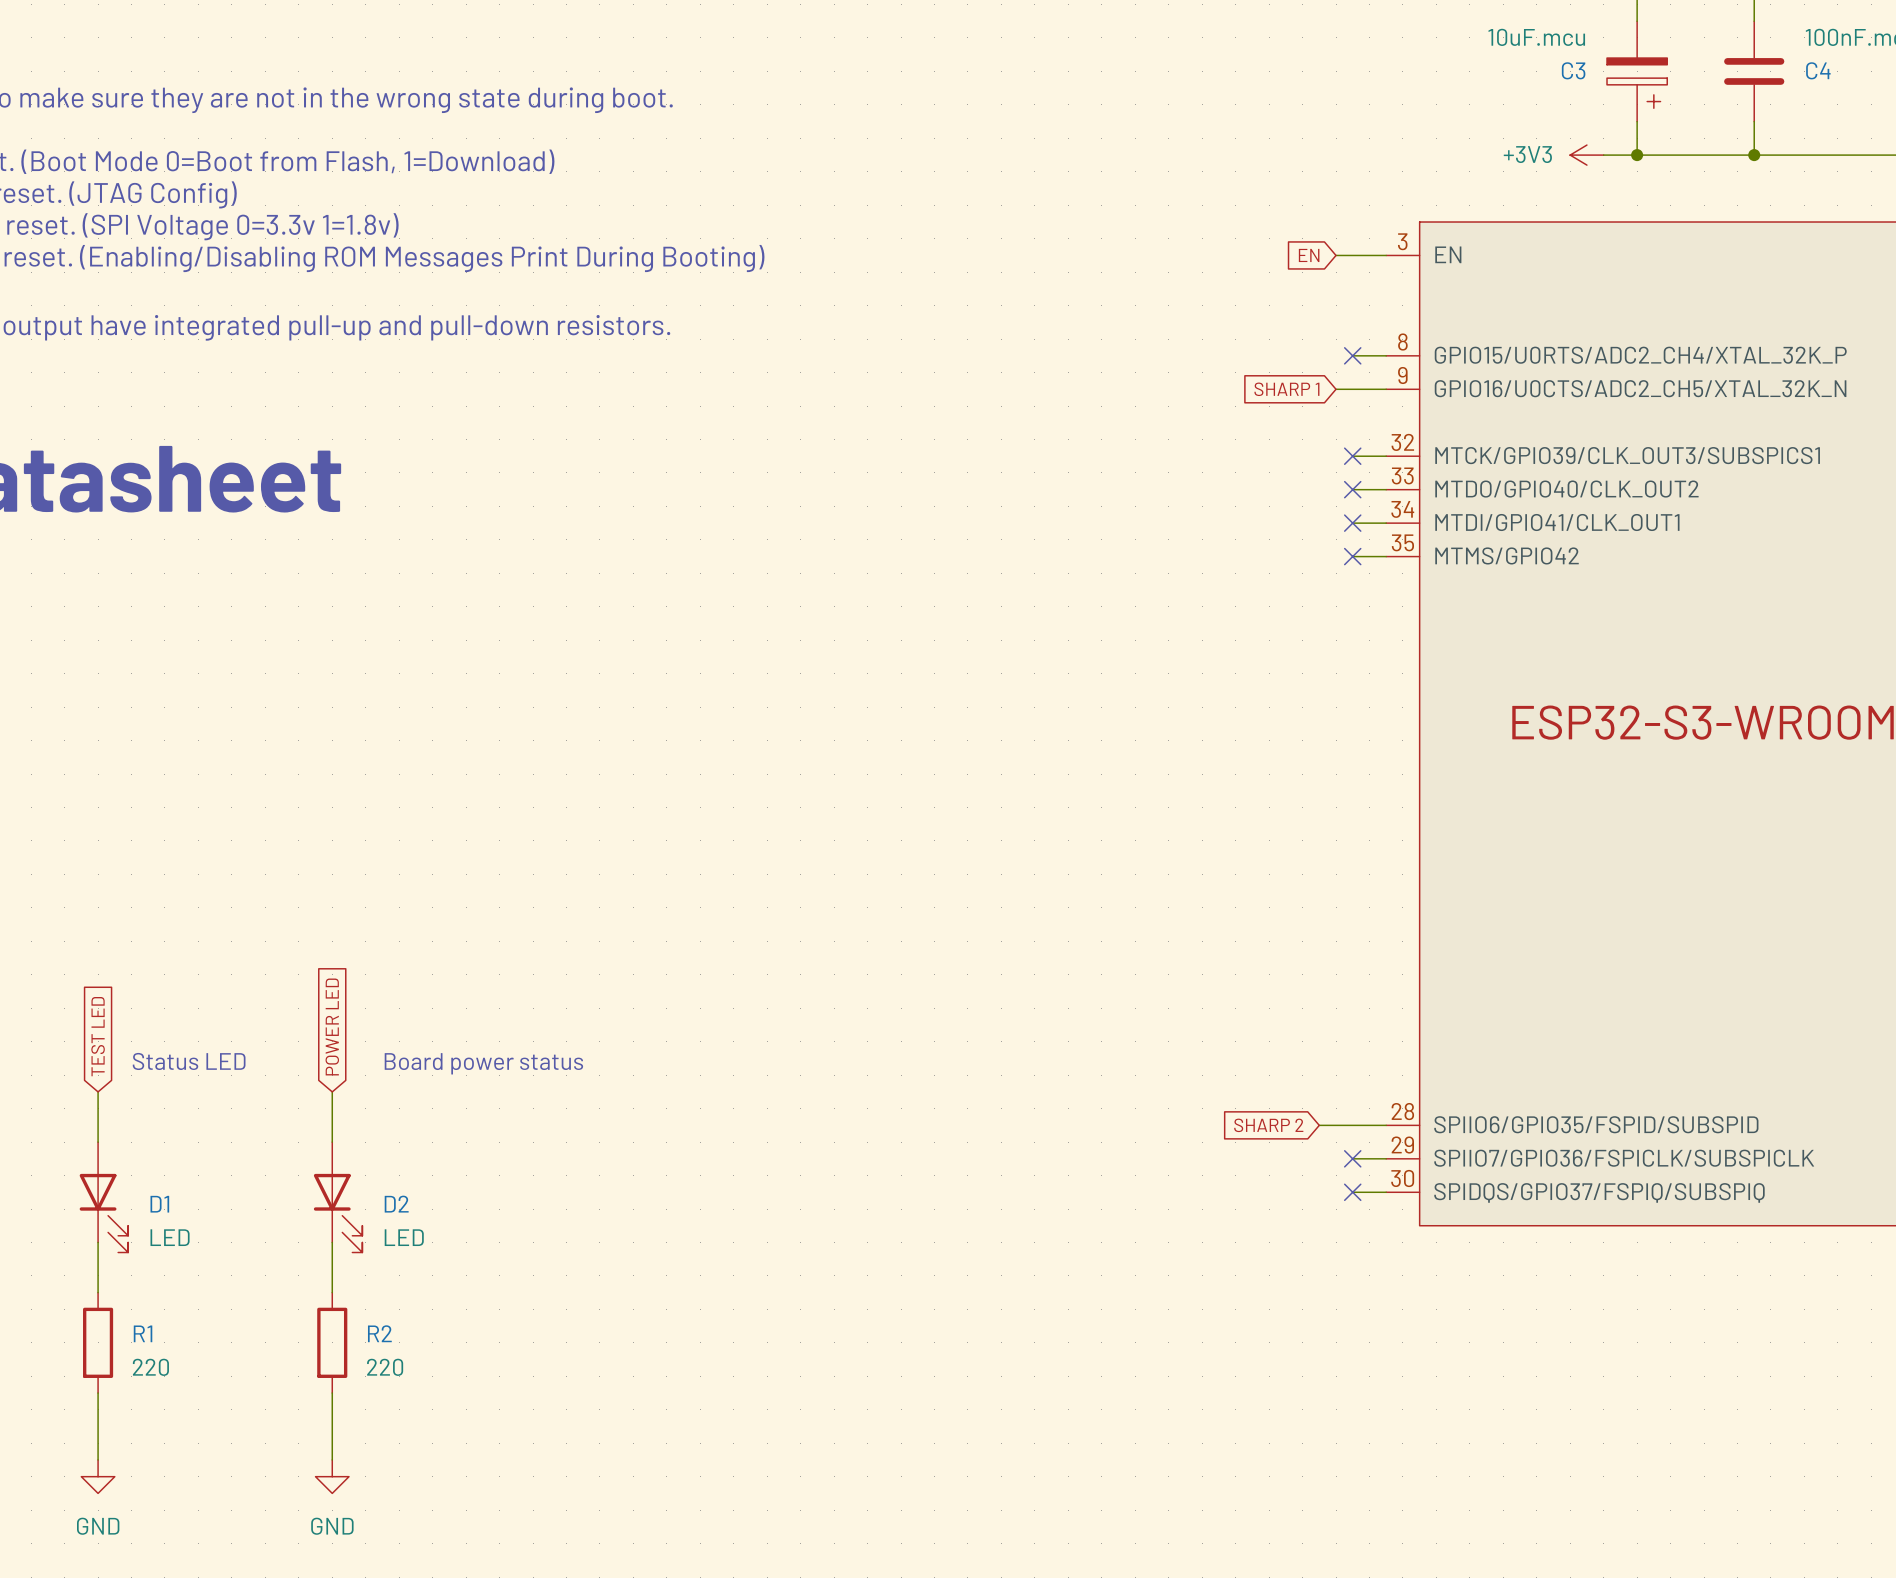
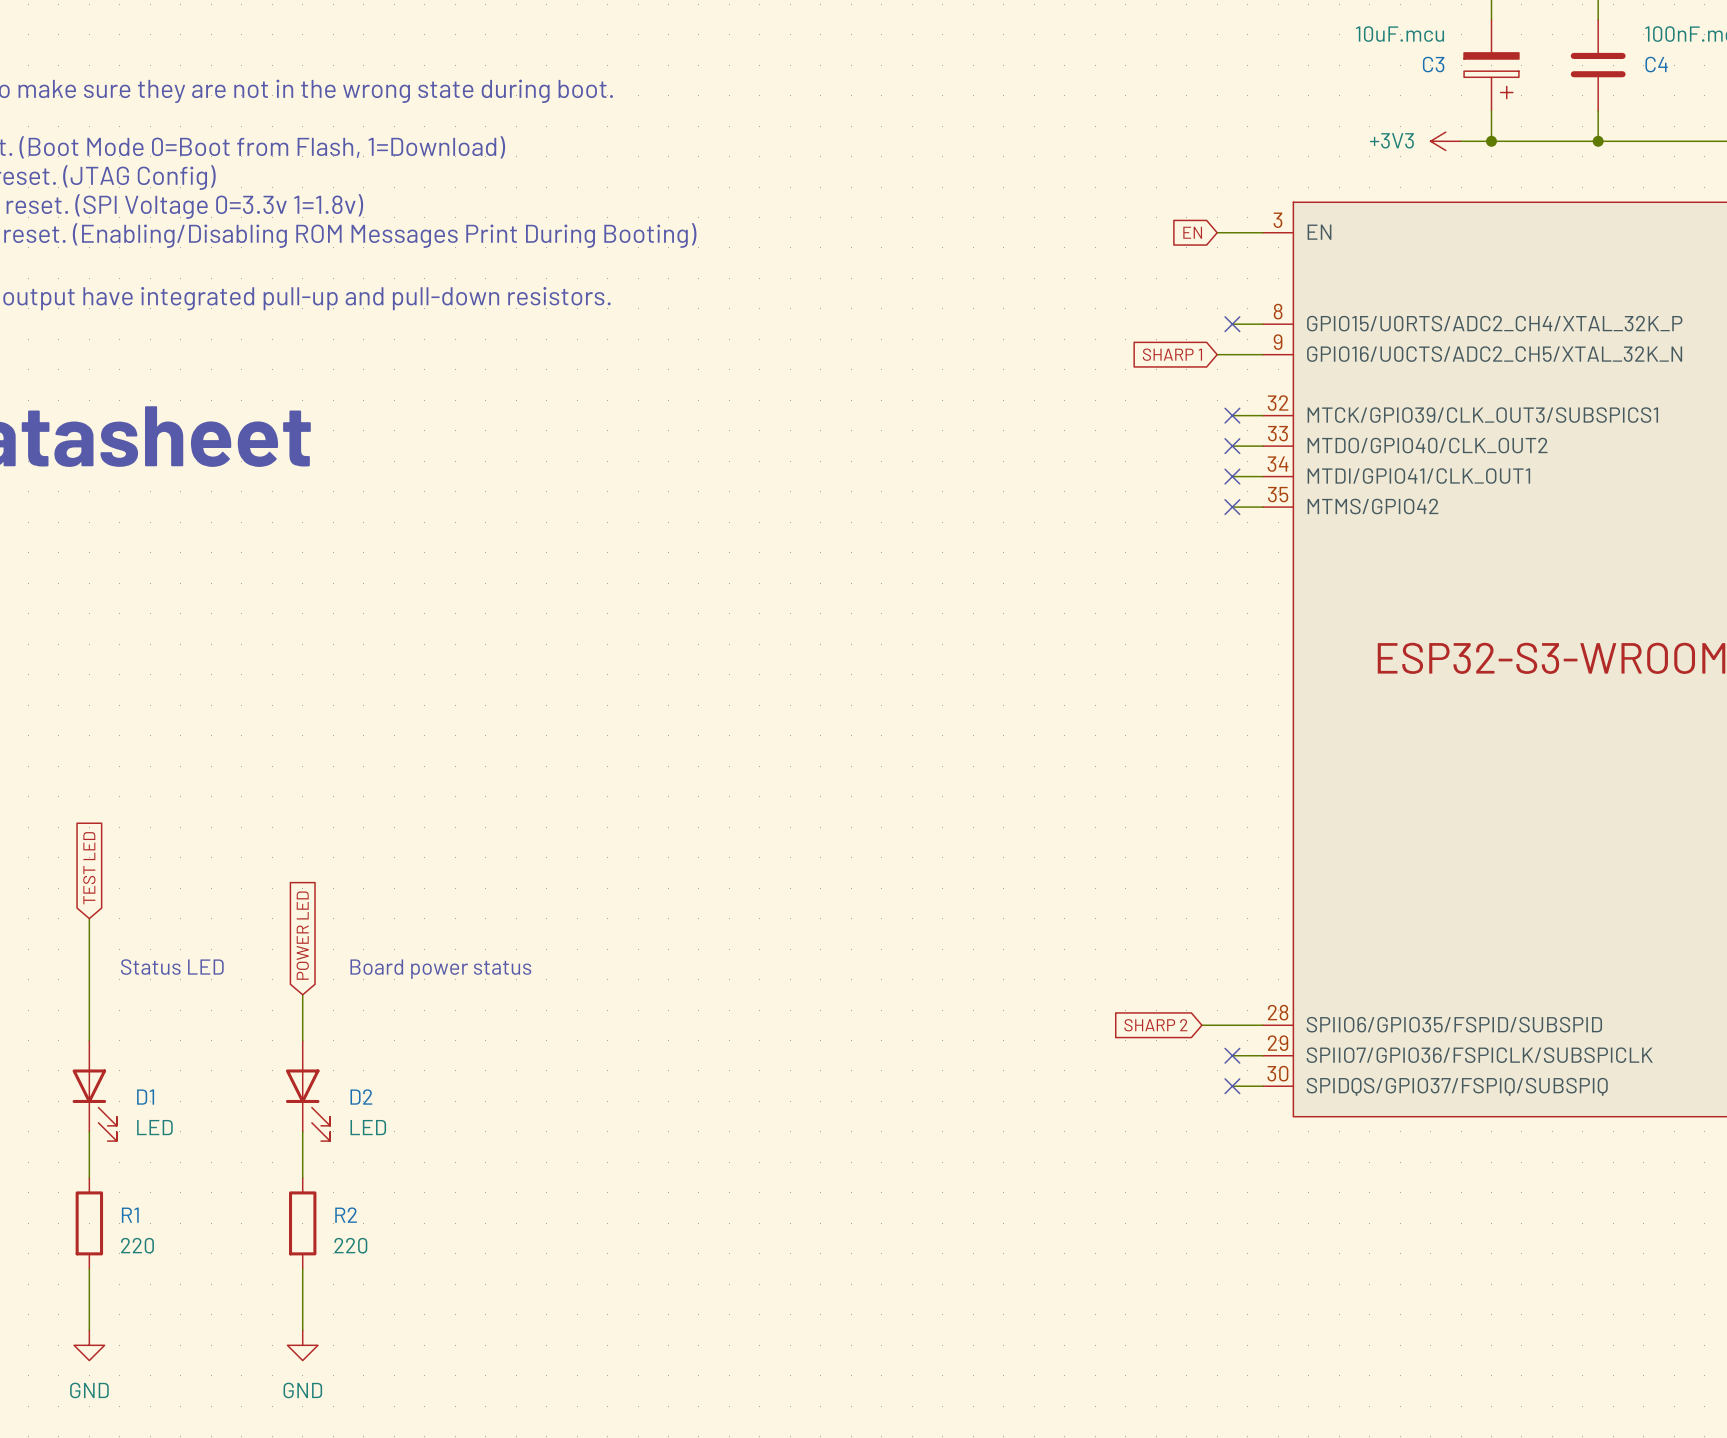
wire: none -> (89, 918) (89, 994)
global label position: TEST LED (98, 1036) -> TEST LED (89, 868)

